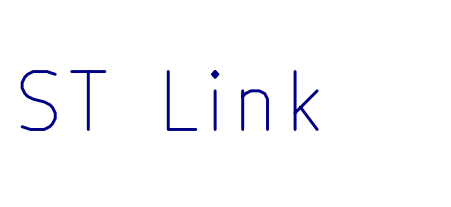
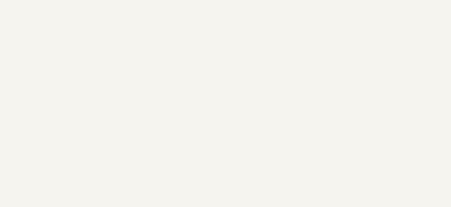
text: ST Link (169, 100) -> none

